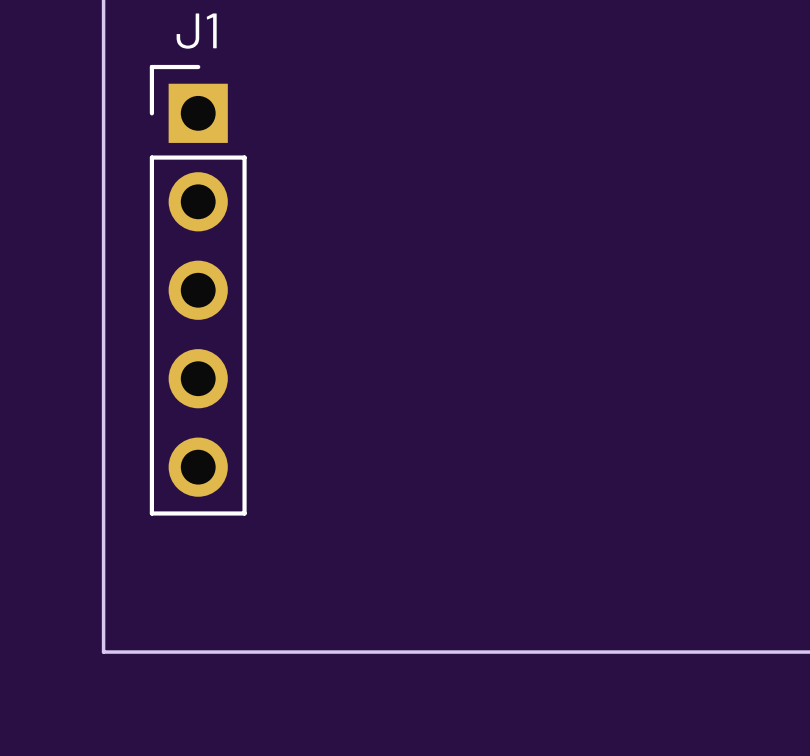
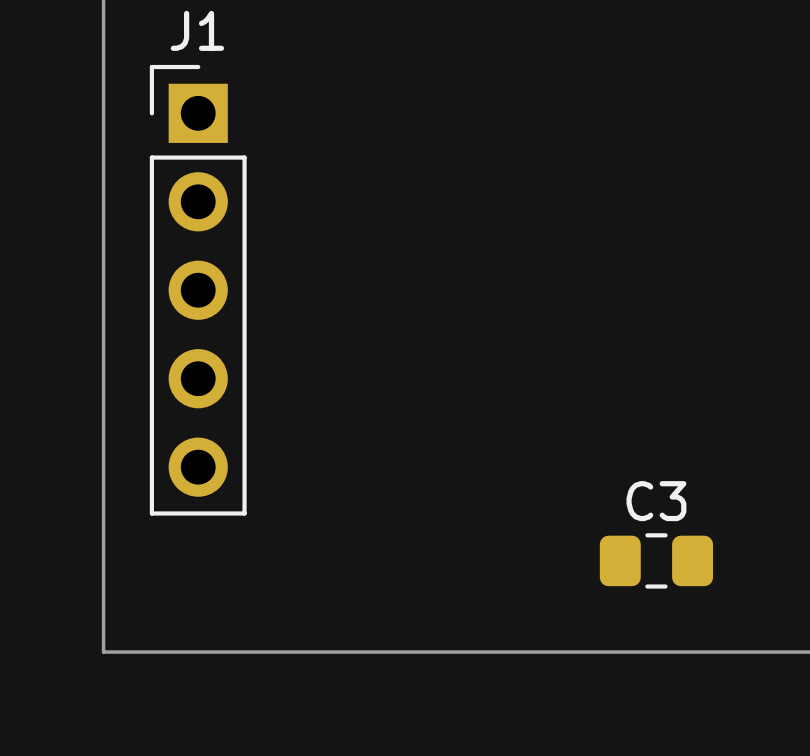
C3: none -> (656, 560)

